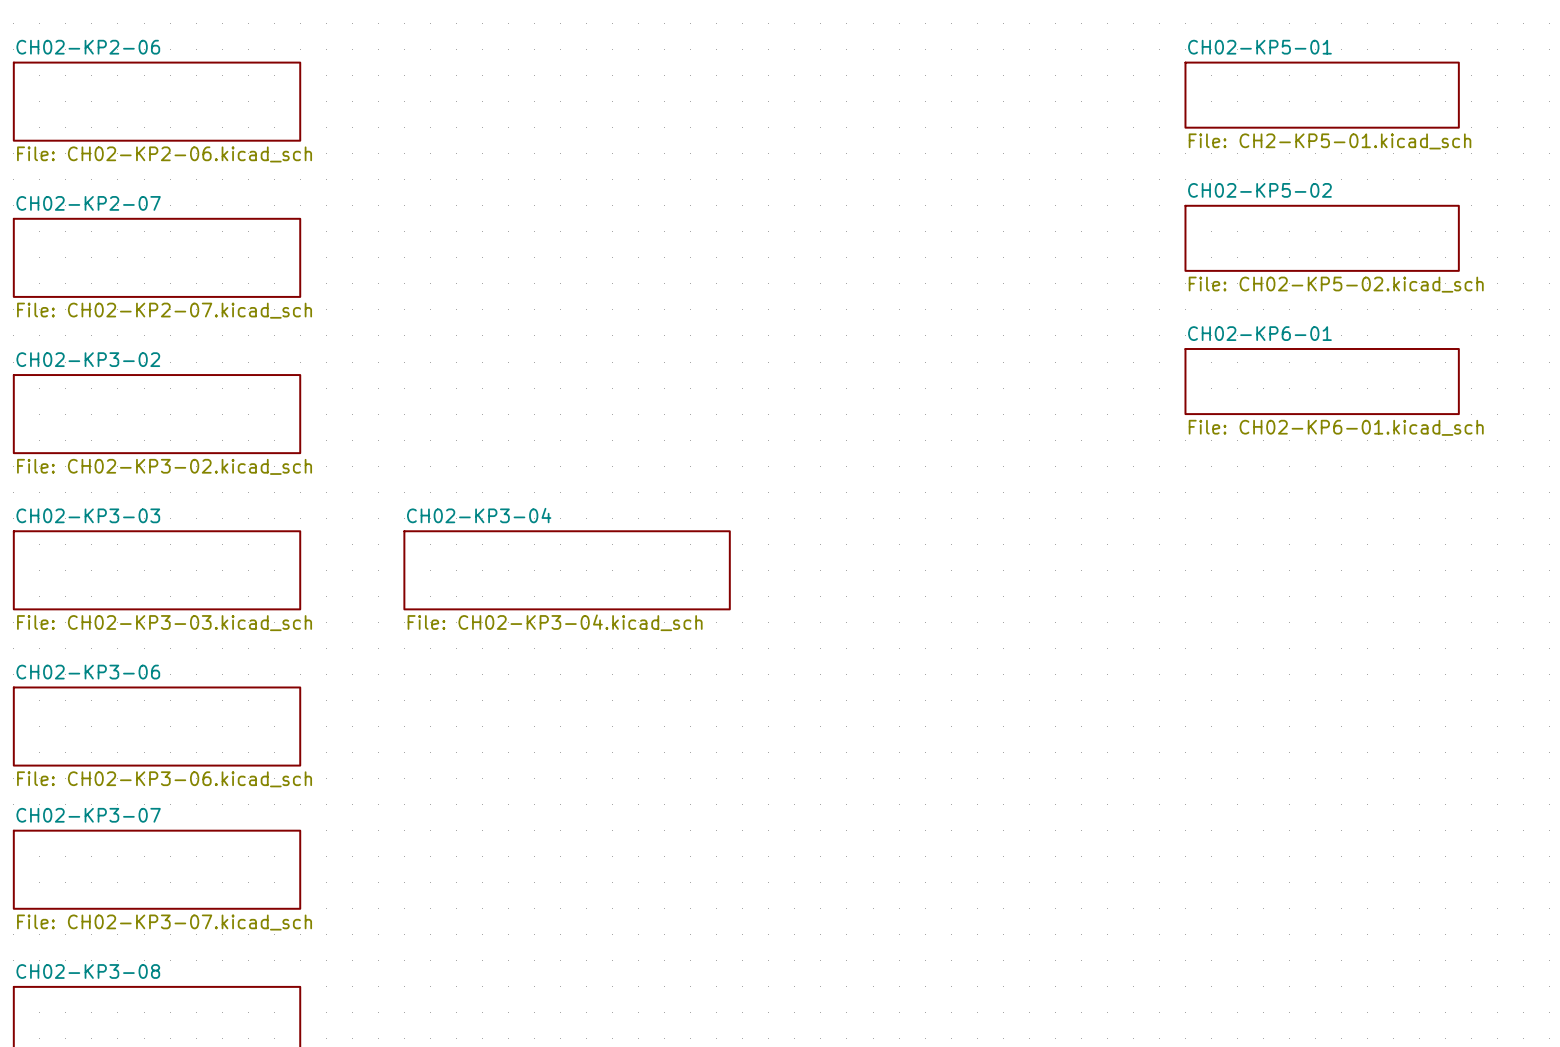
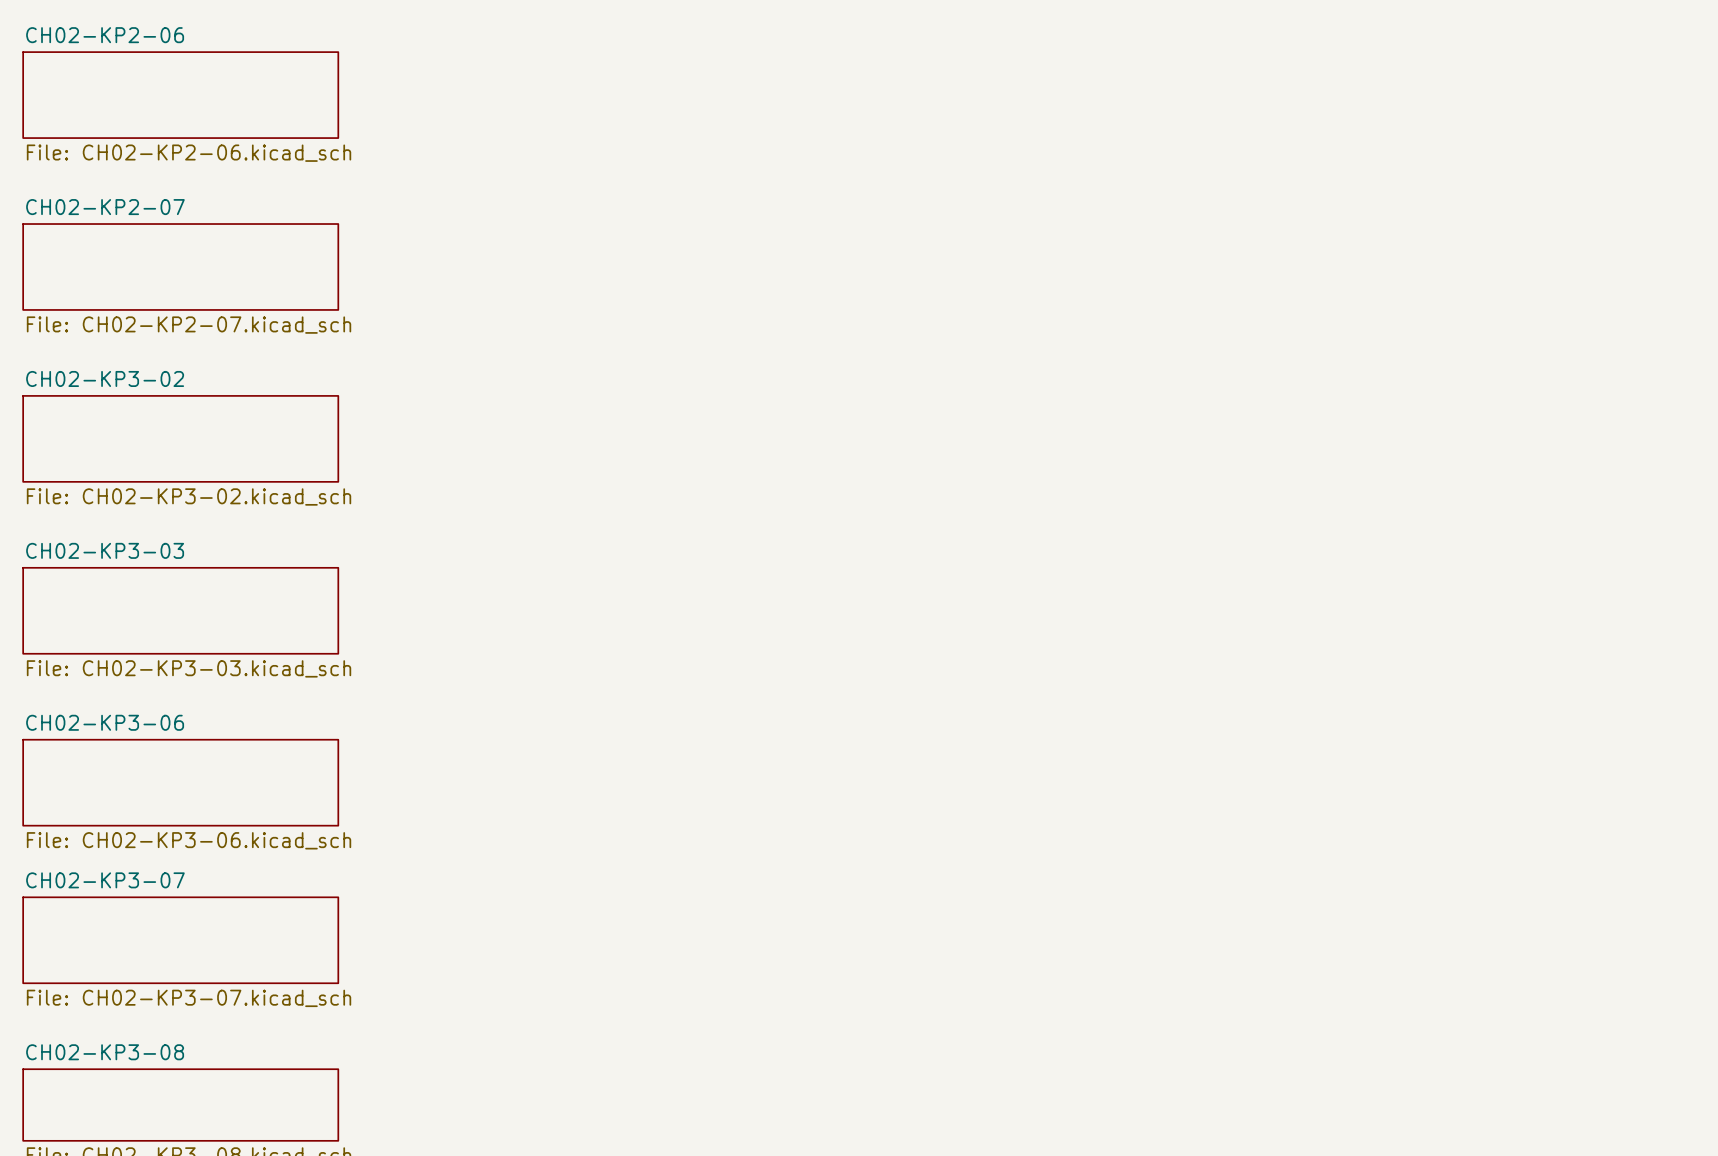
sheet CH02-KP5-01: File: CH2-KP5-01.kicad_sch (1322, 95) -> none
sheet CH02-KP5-02: File: CH02-KP5-02.kicad_sch (1322, 238) -> none
sheet CH02-KP6-01: File: CH02-KP6-01.kicad_sch (1322, 381) -> none
sheet CH02-KP3-04: File: CH02-KP3-04.kicad_sch (567, 570) -> none

